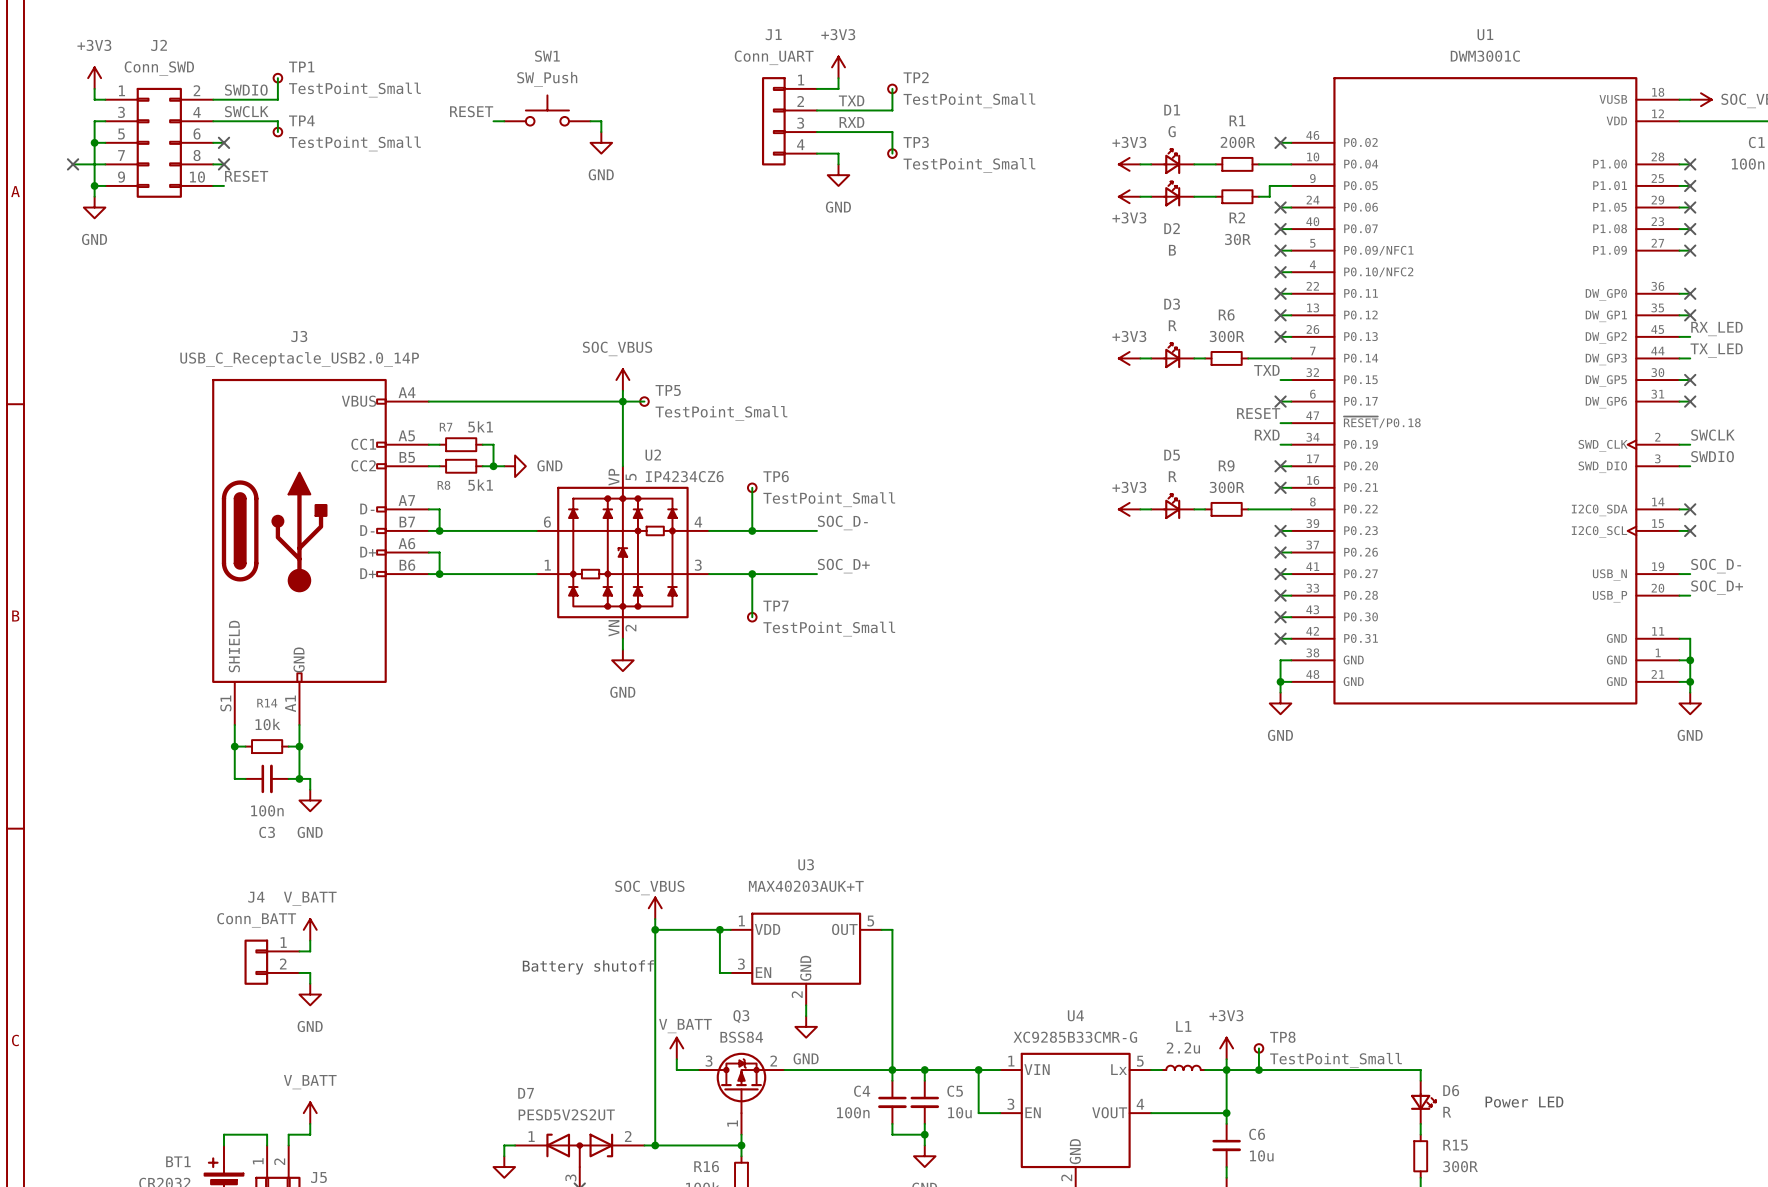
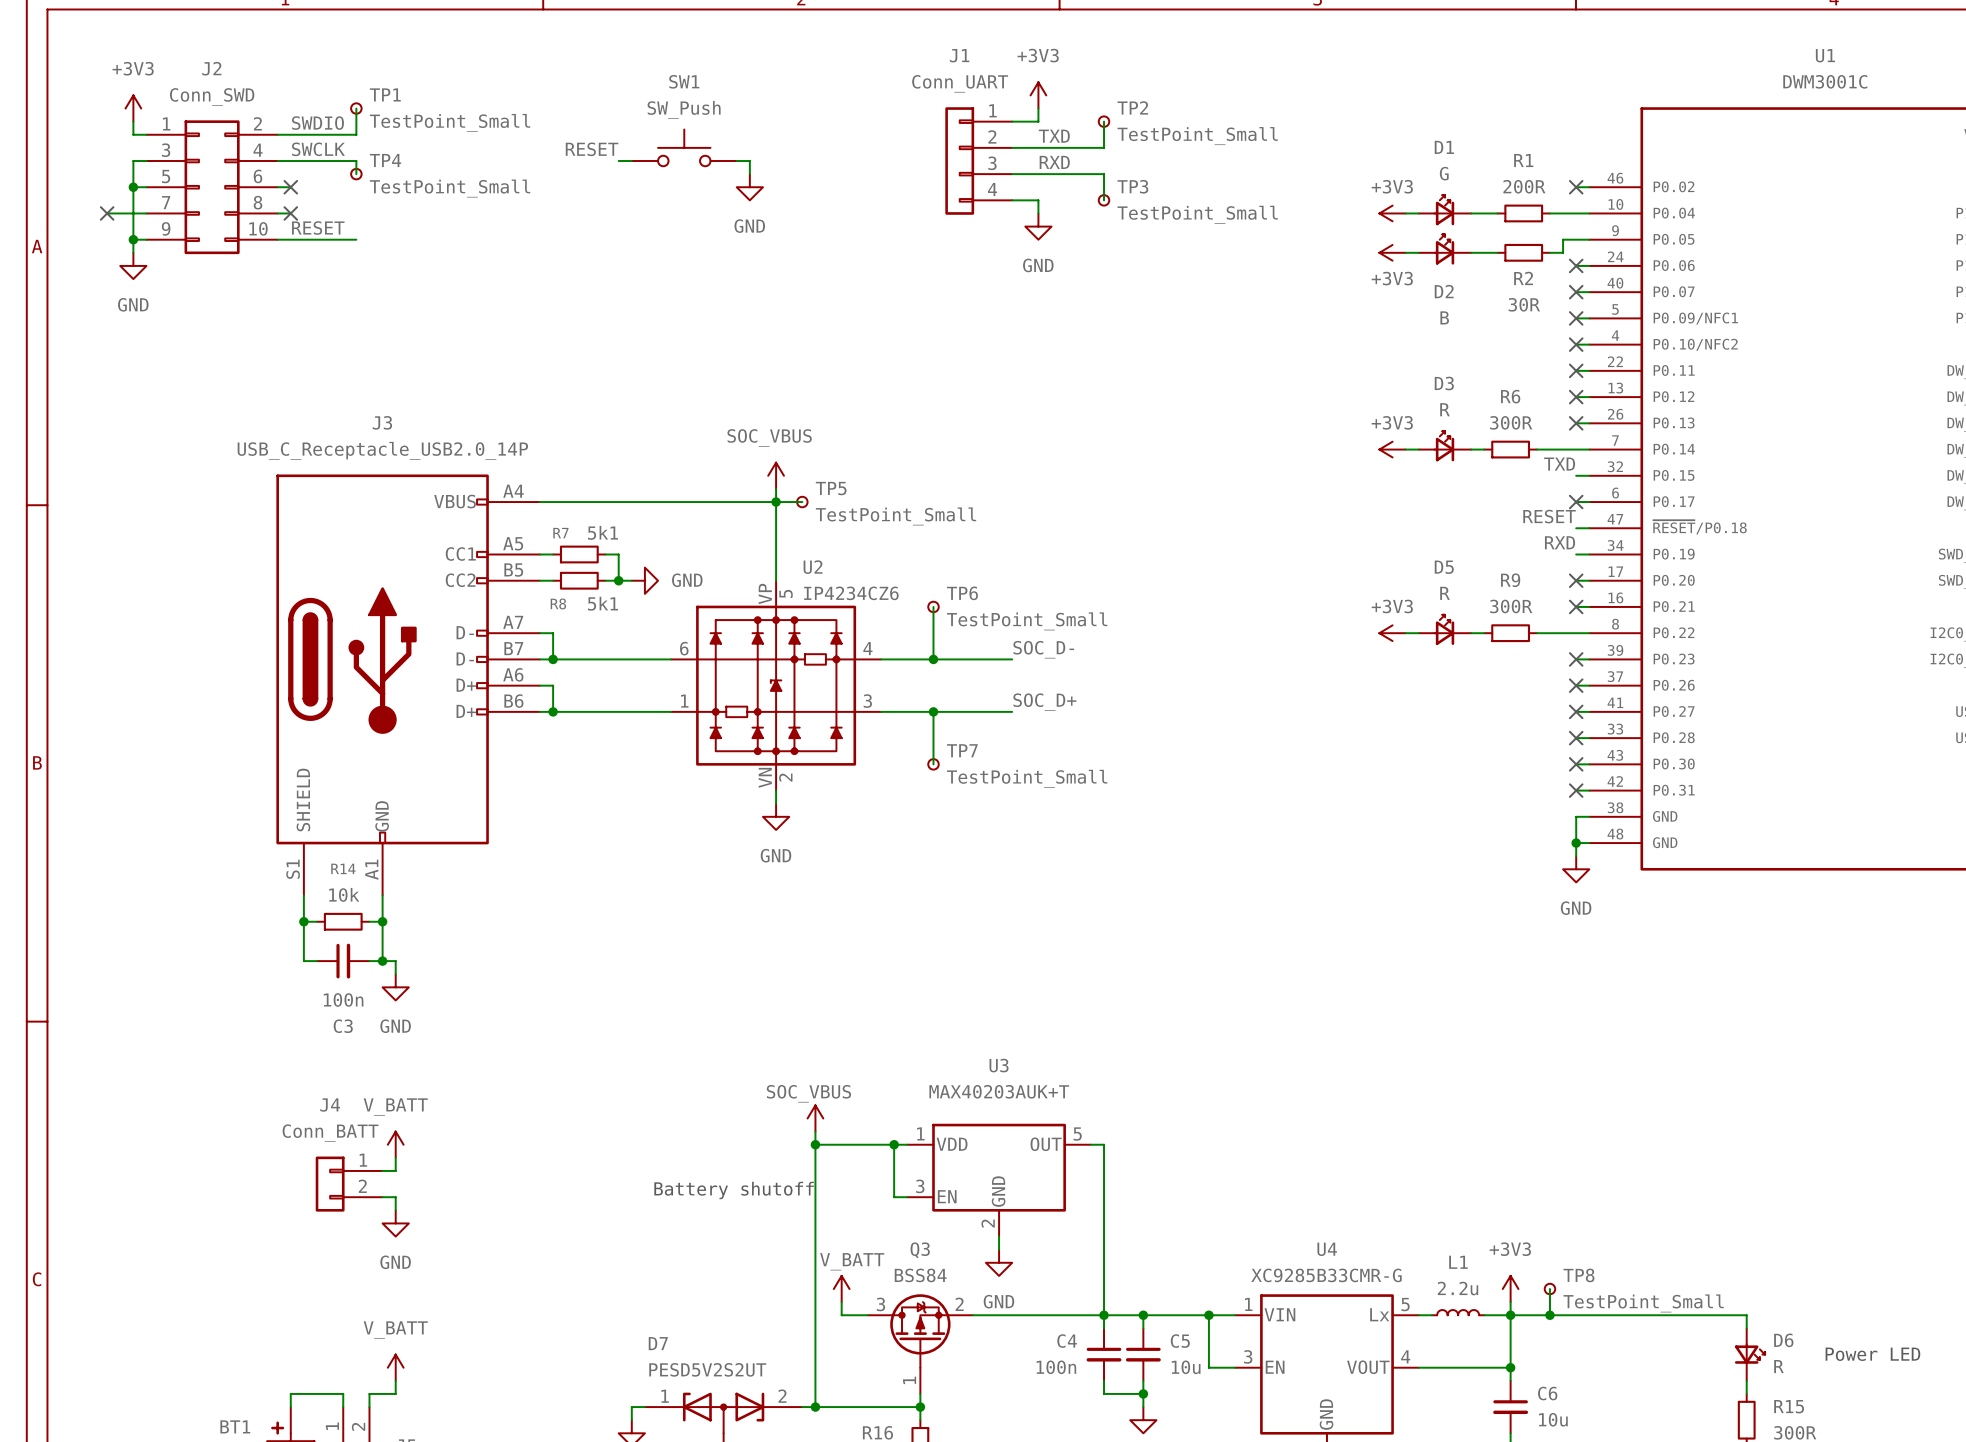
wire: none -> (290, 239) (356, 239)

